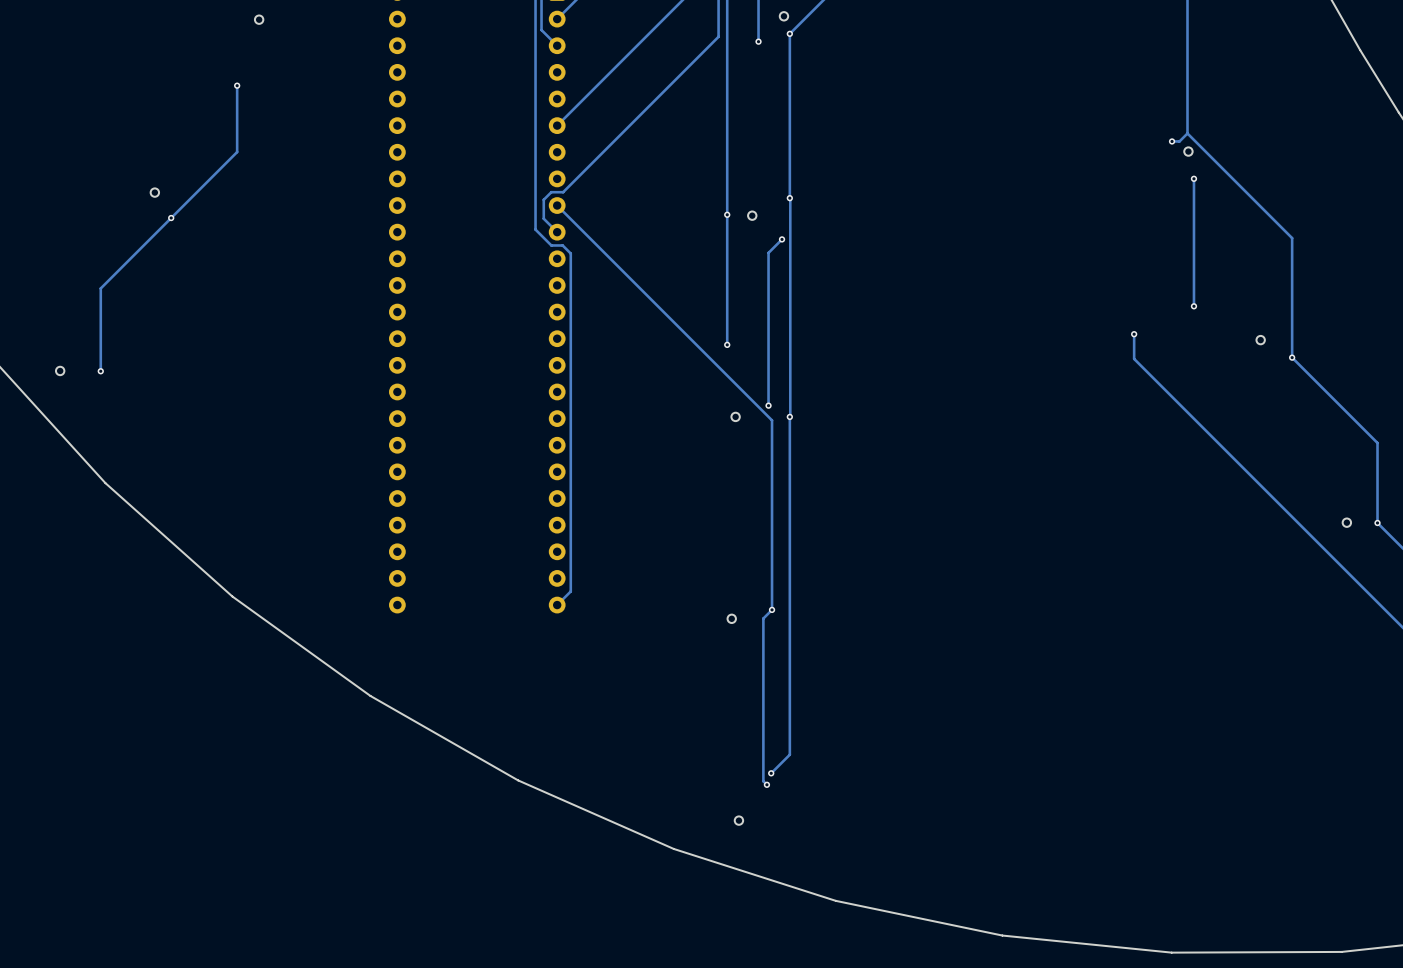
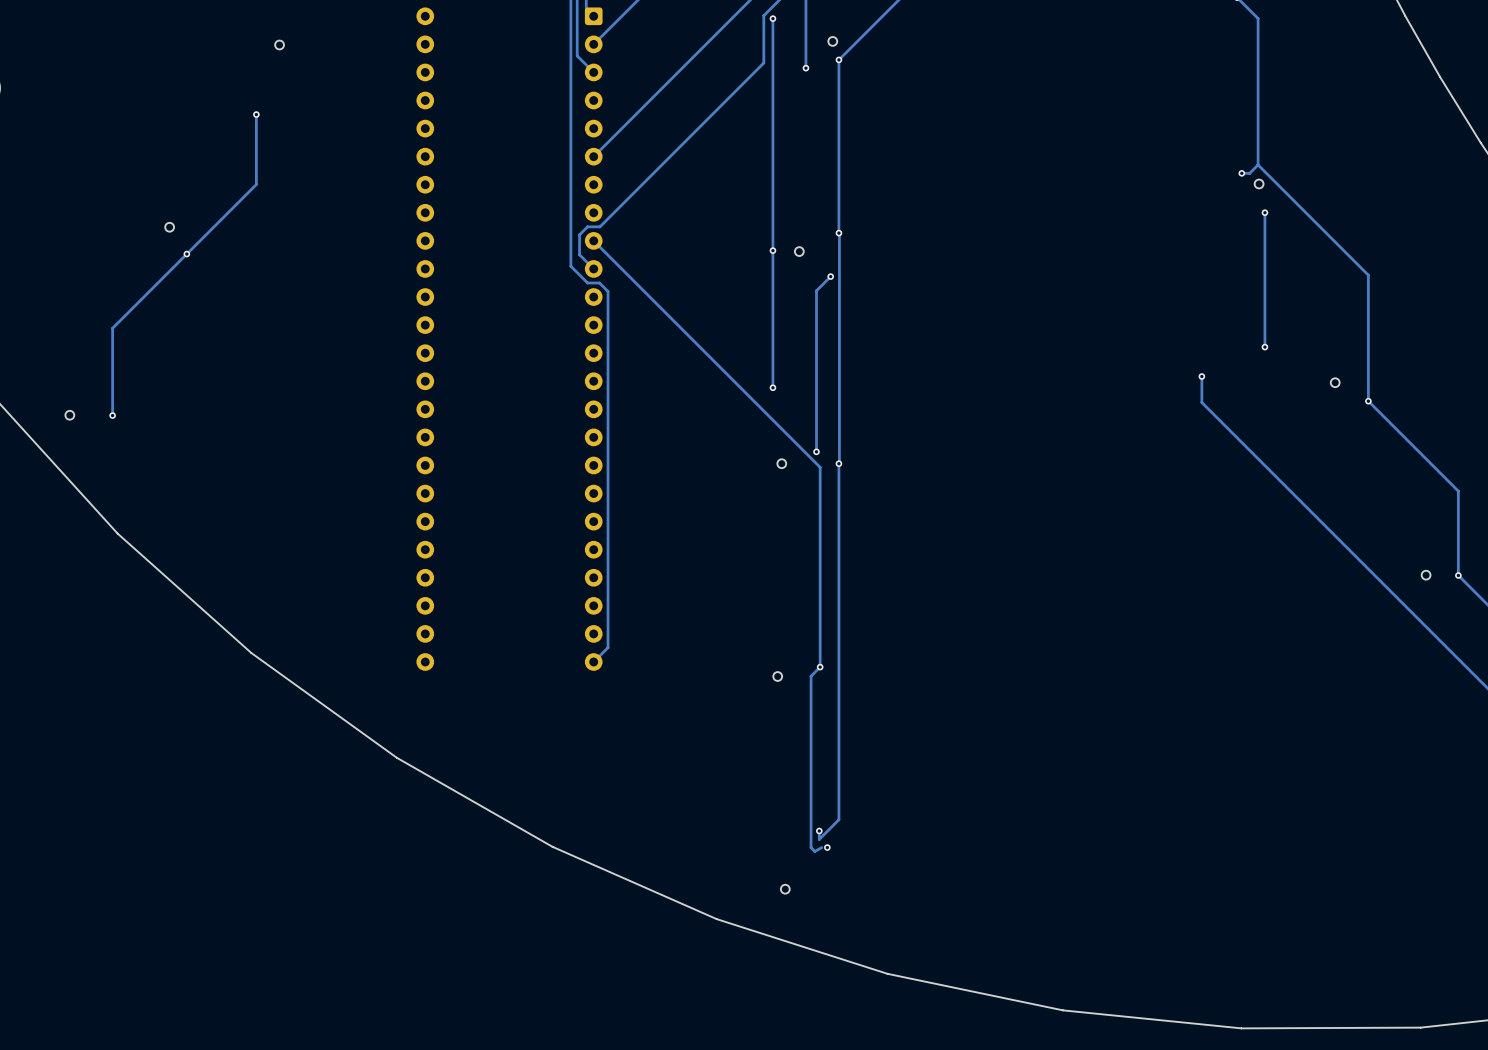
track: none -> (819, 830) (819, 839)
via: none -> (819, 830)
via: (771, 773) -> none
track: none -> (821, 847) (814, 851)
via: none -> (827, 847)
via: (766, 784) -> none

